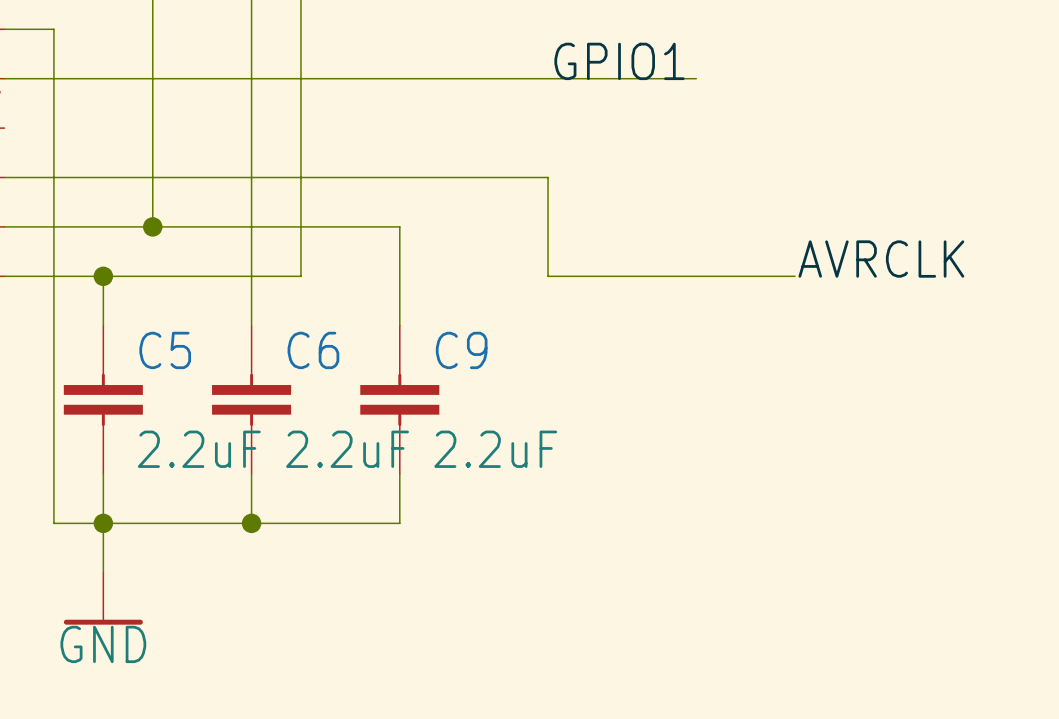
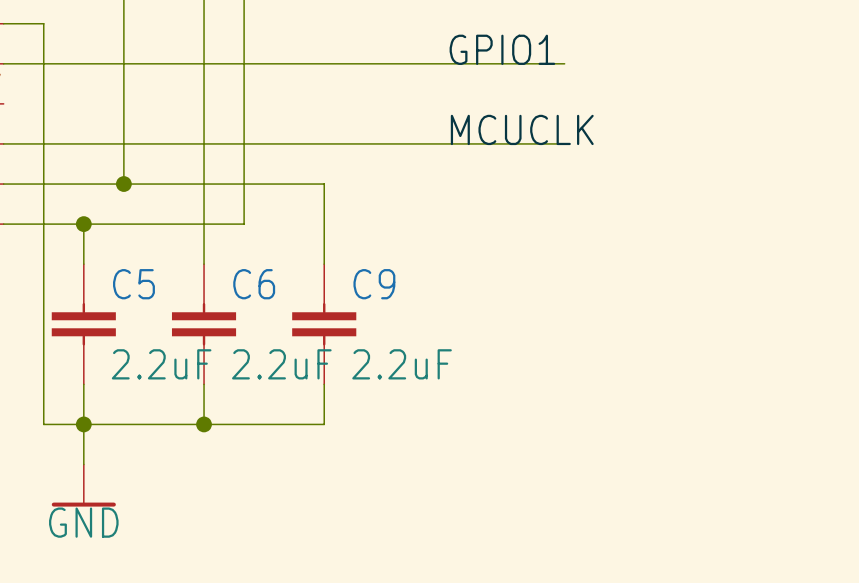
label: none -> MCUCLK (522, 129)
wire: (548, 177) (548, 276) (795, 276) -> (444, 143) (564, 143)
label: AVRCLK (881, 259) -> none

